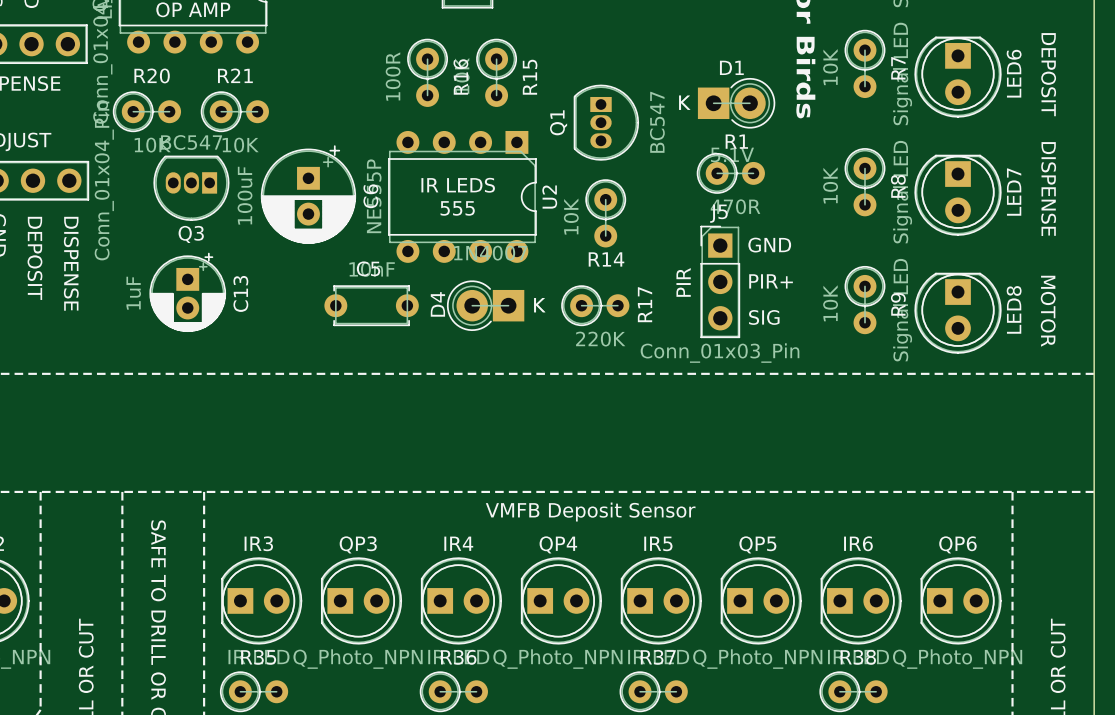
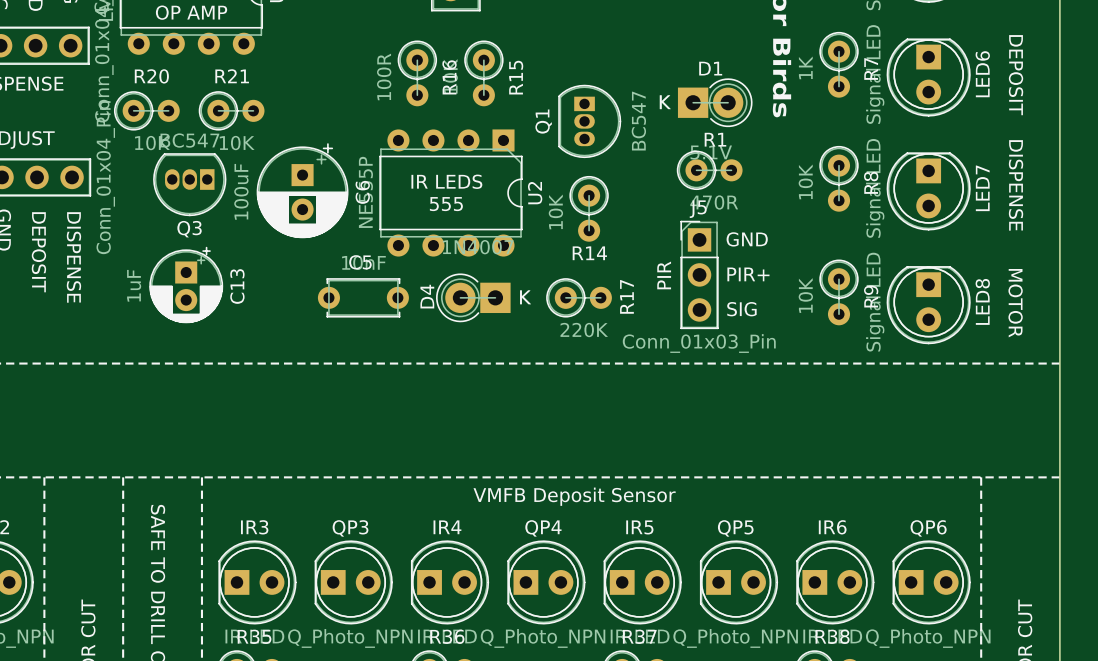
R7 value: 10K (830, 67) -> 1K (805, 67)

